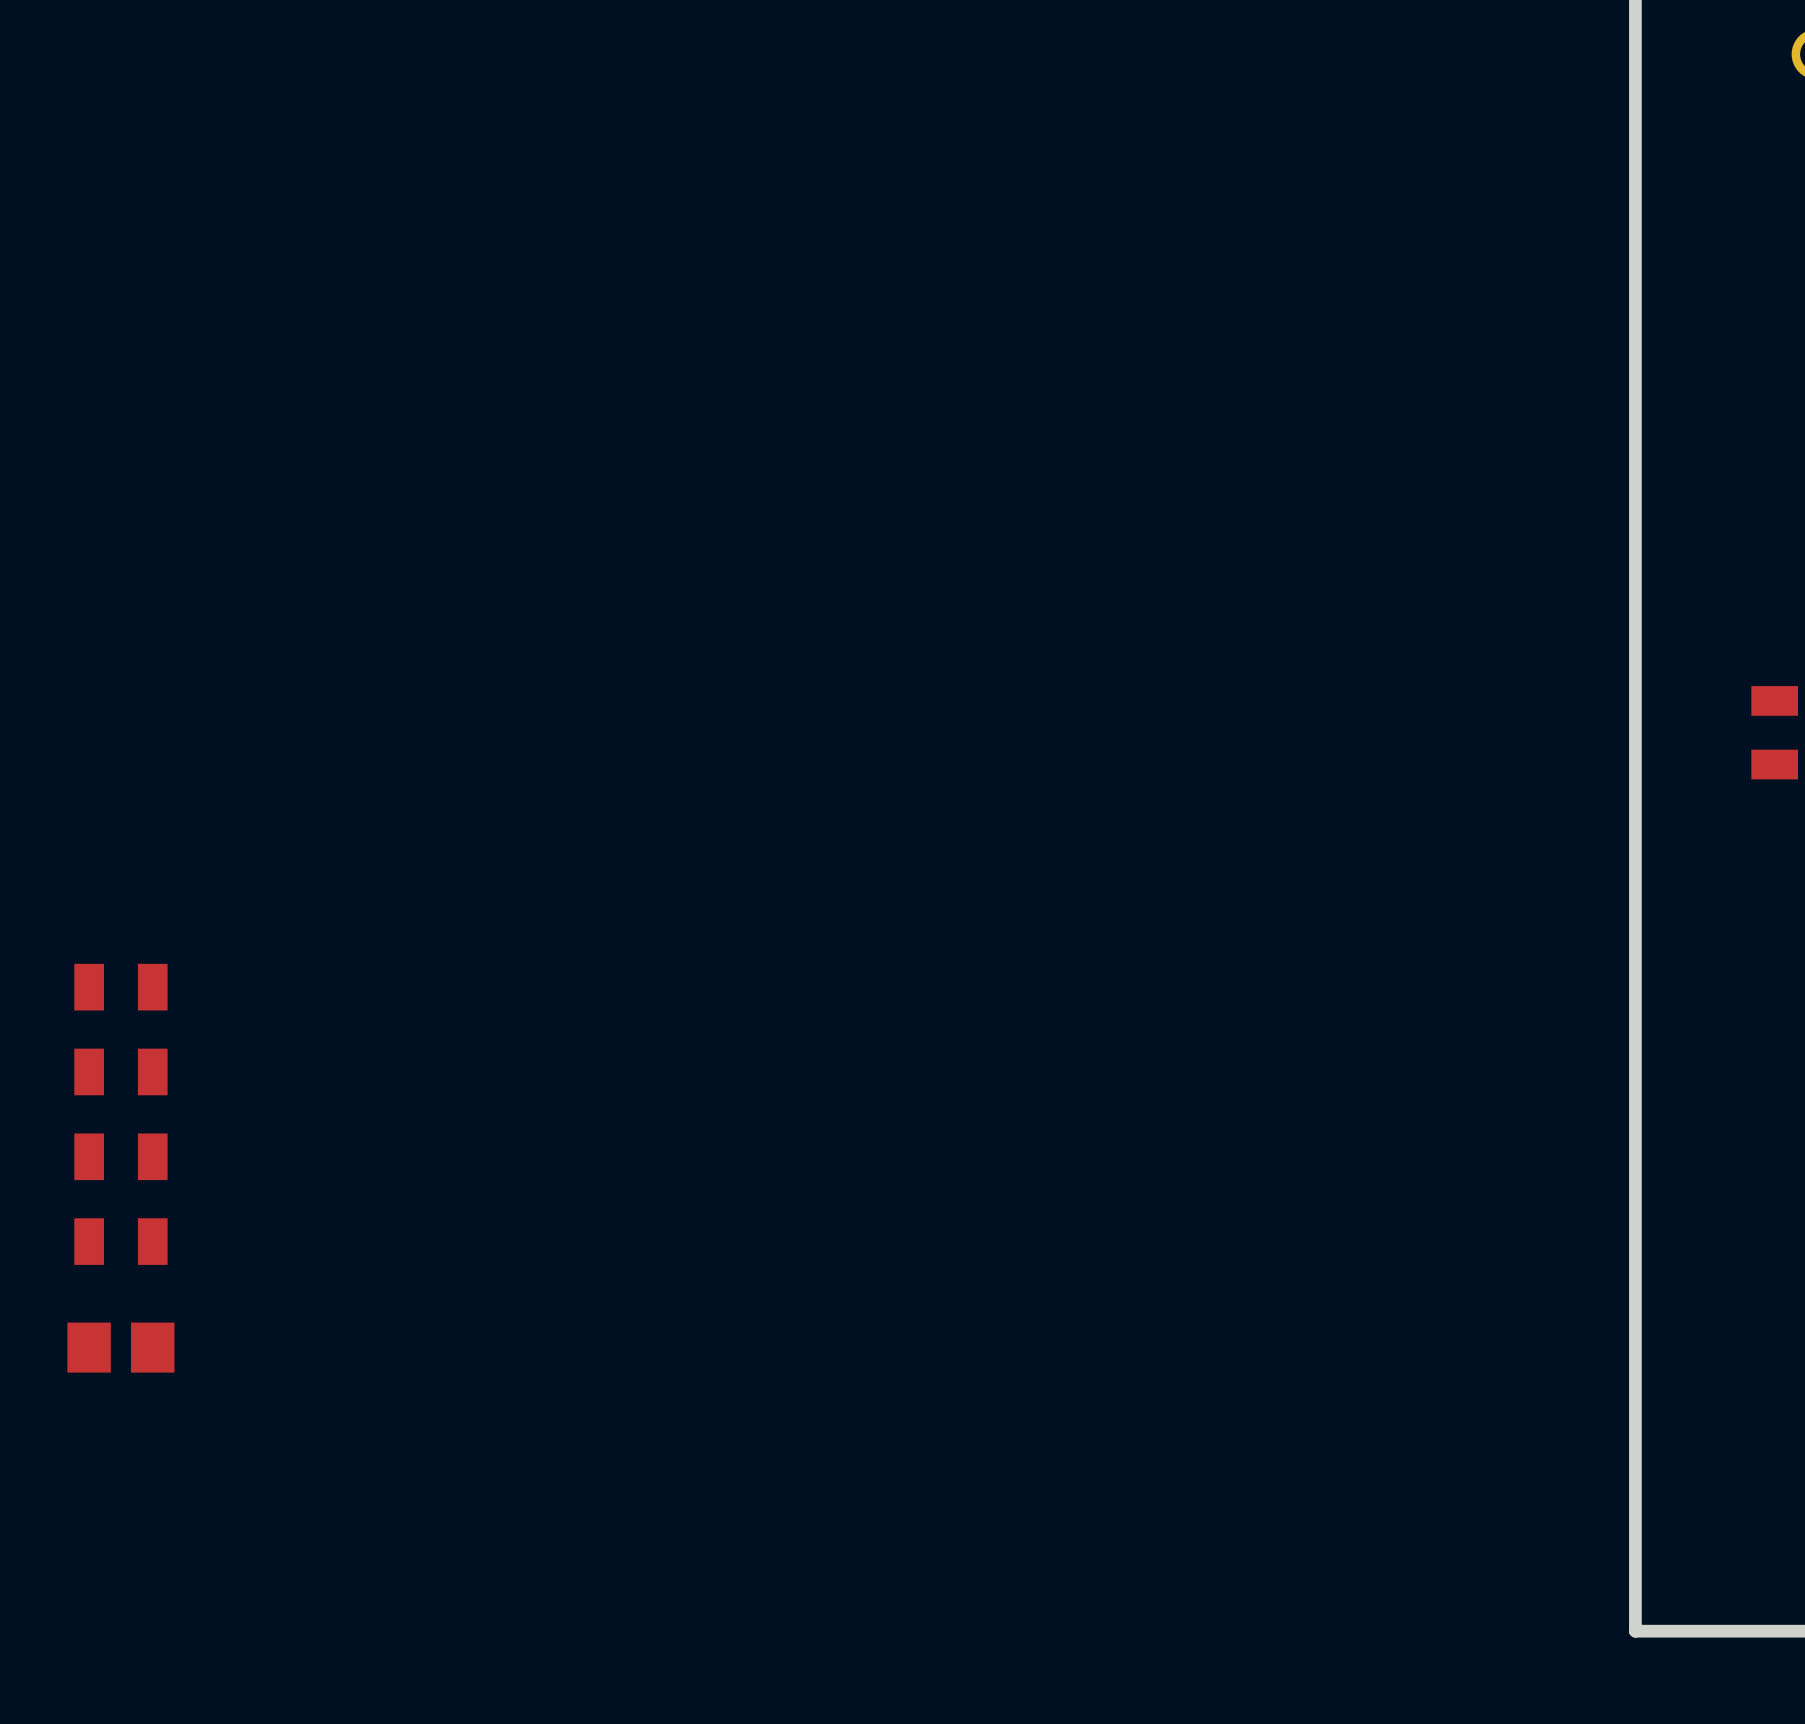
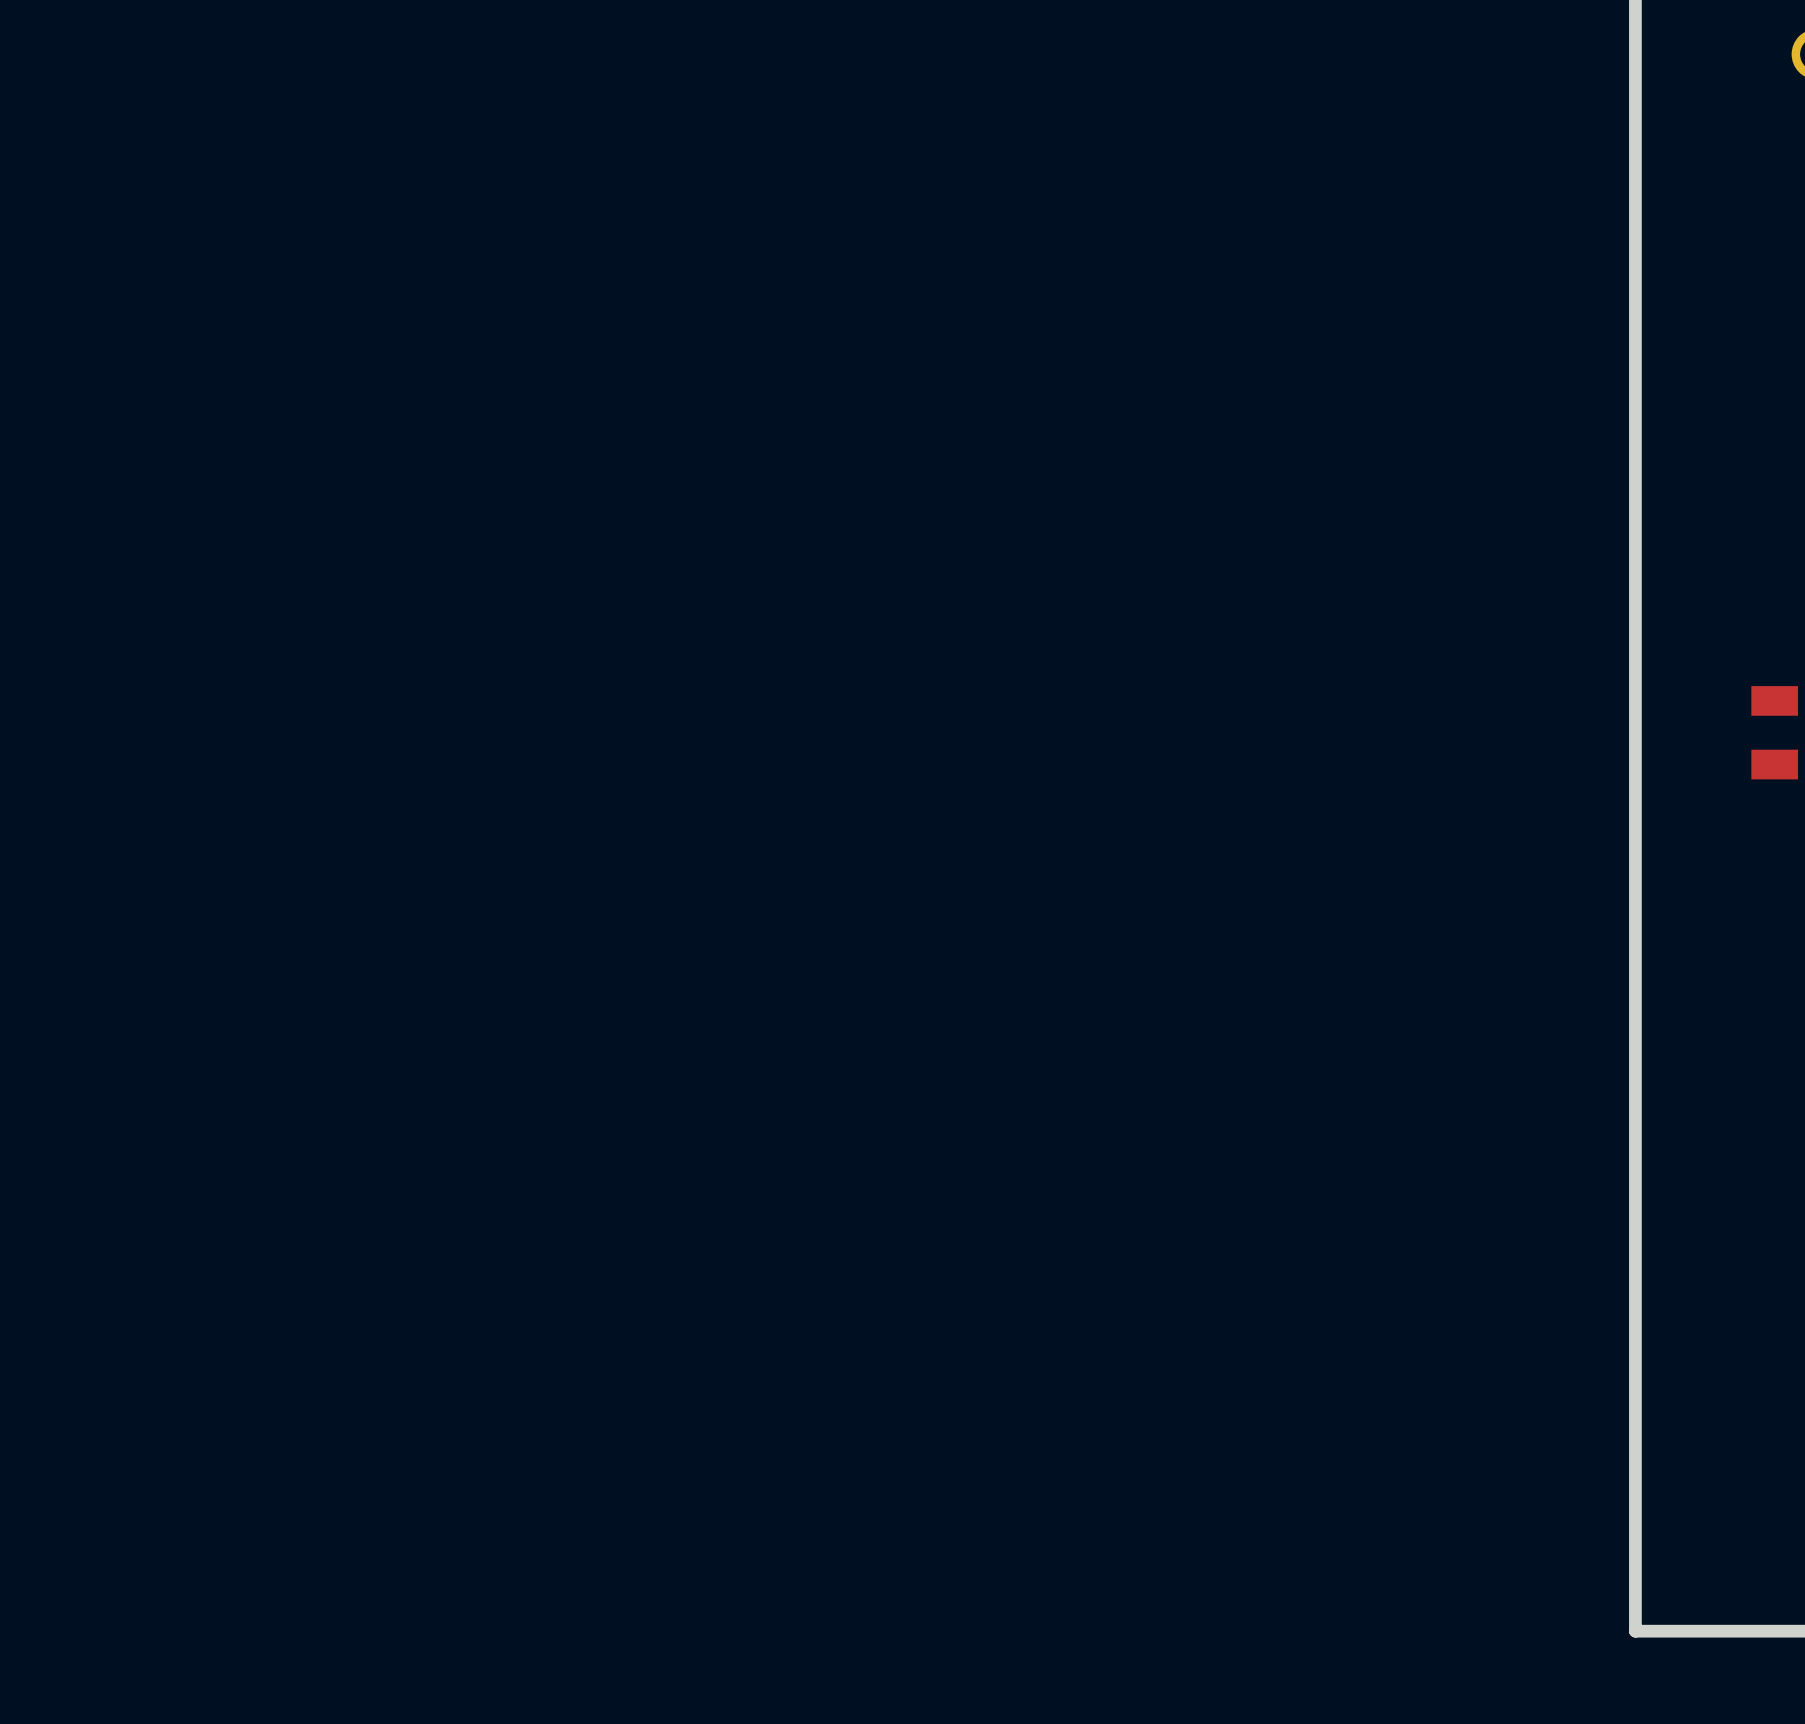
part: (120, 987) -> none
part: (120, 1071) -> none
part: (120, 1156) -> none
part: (120, 1241) -> none
part: (120, 1347) -> none

